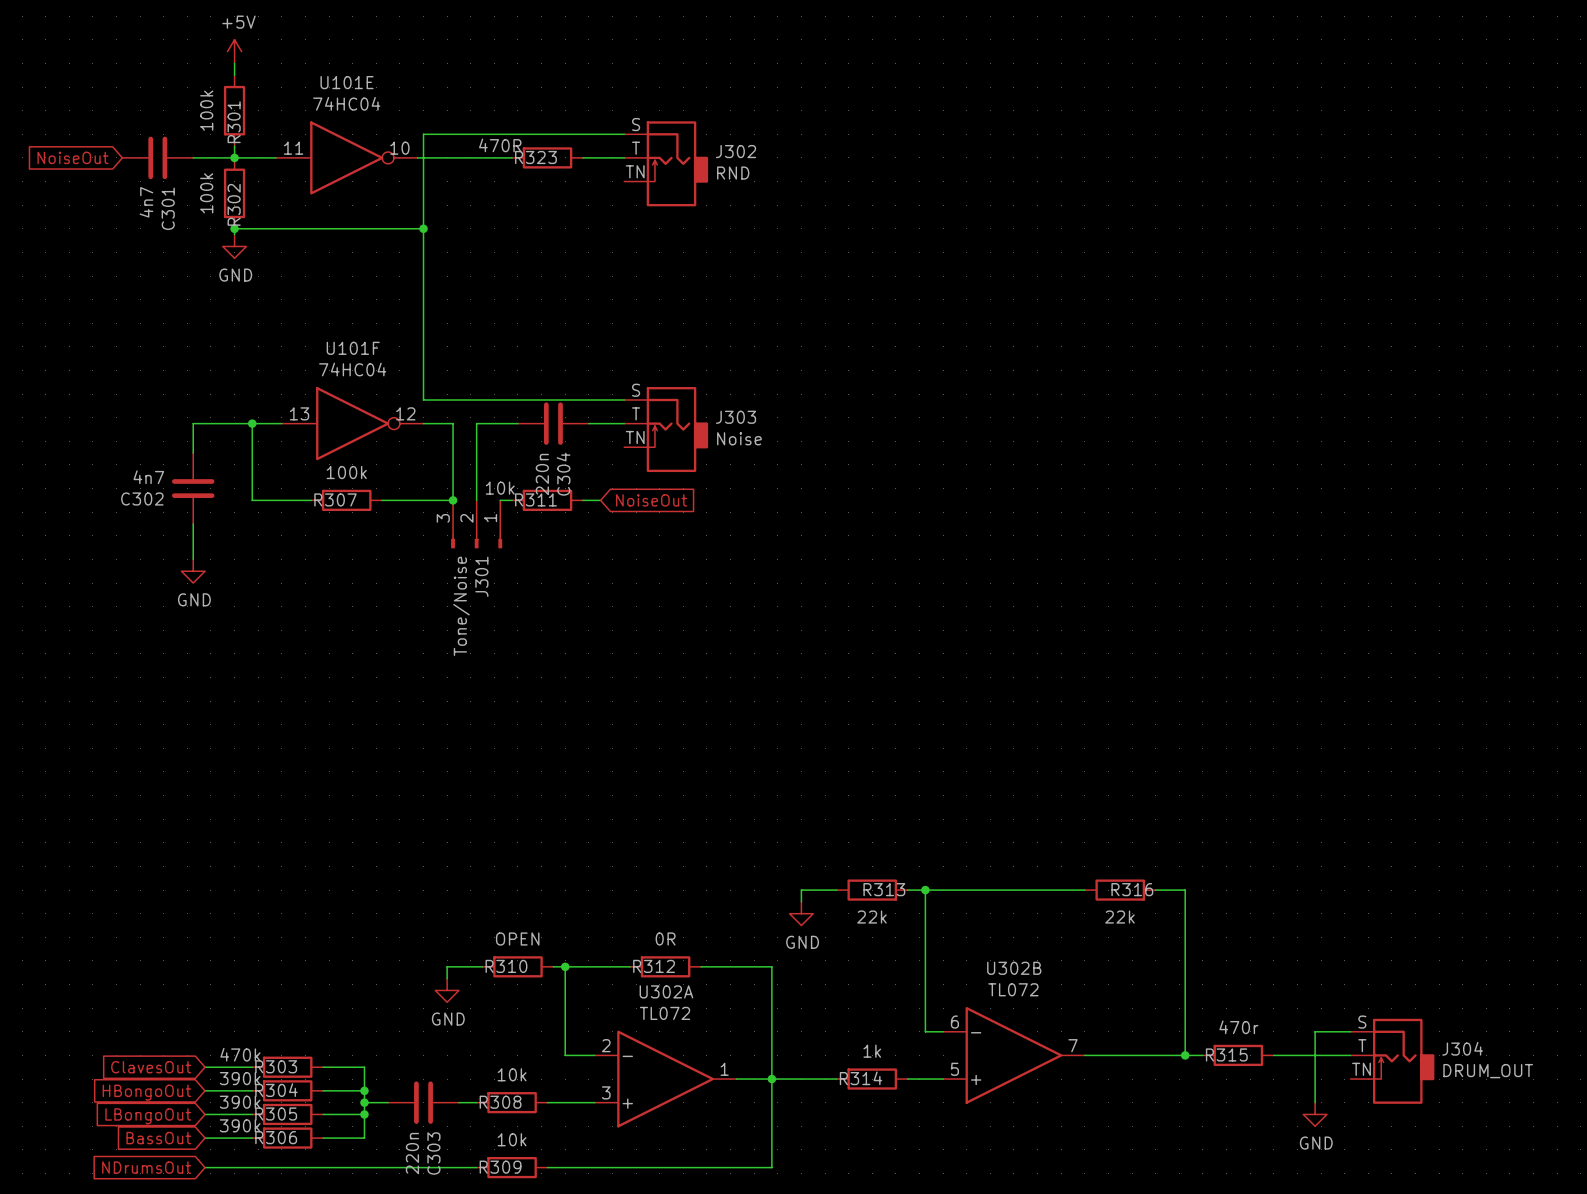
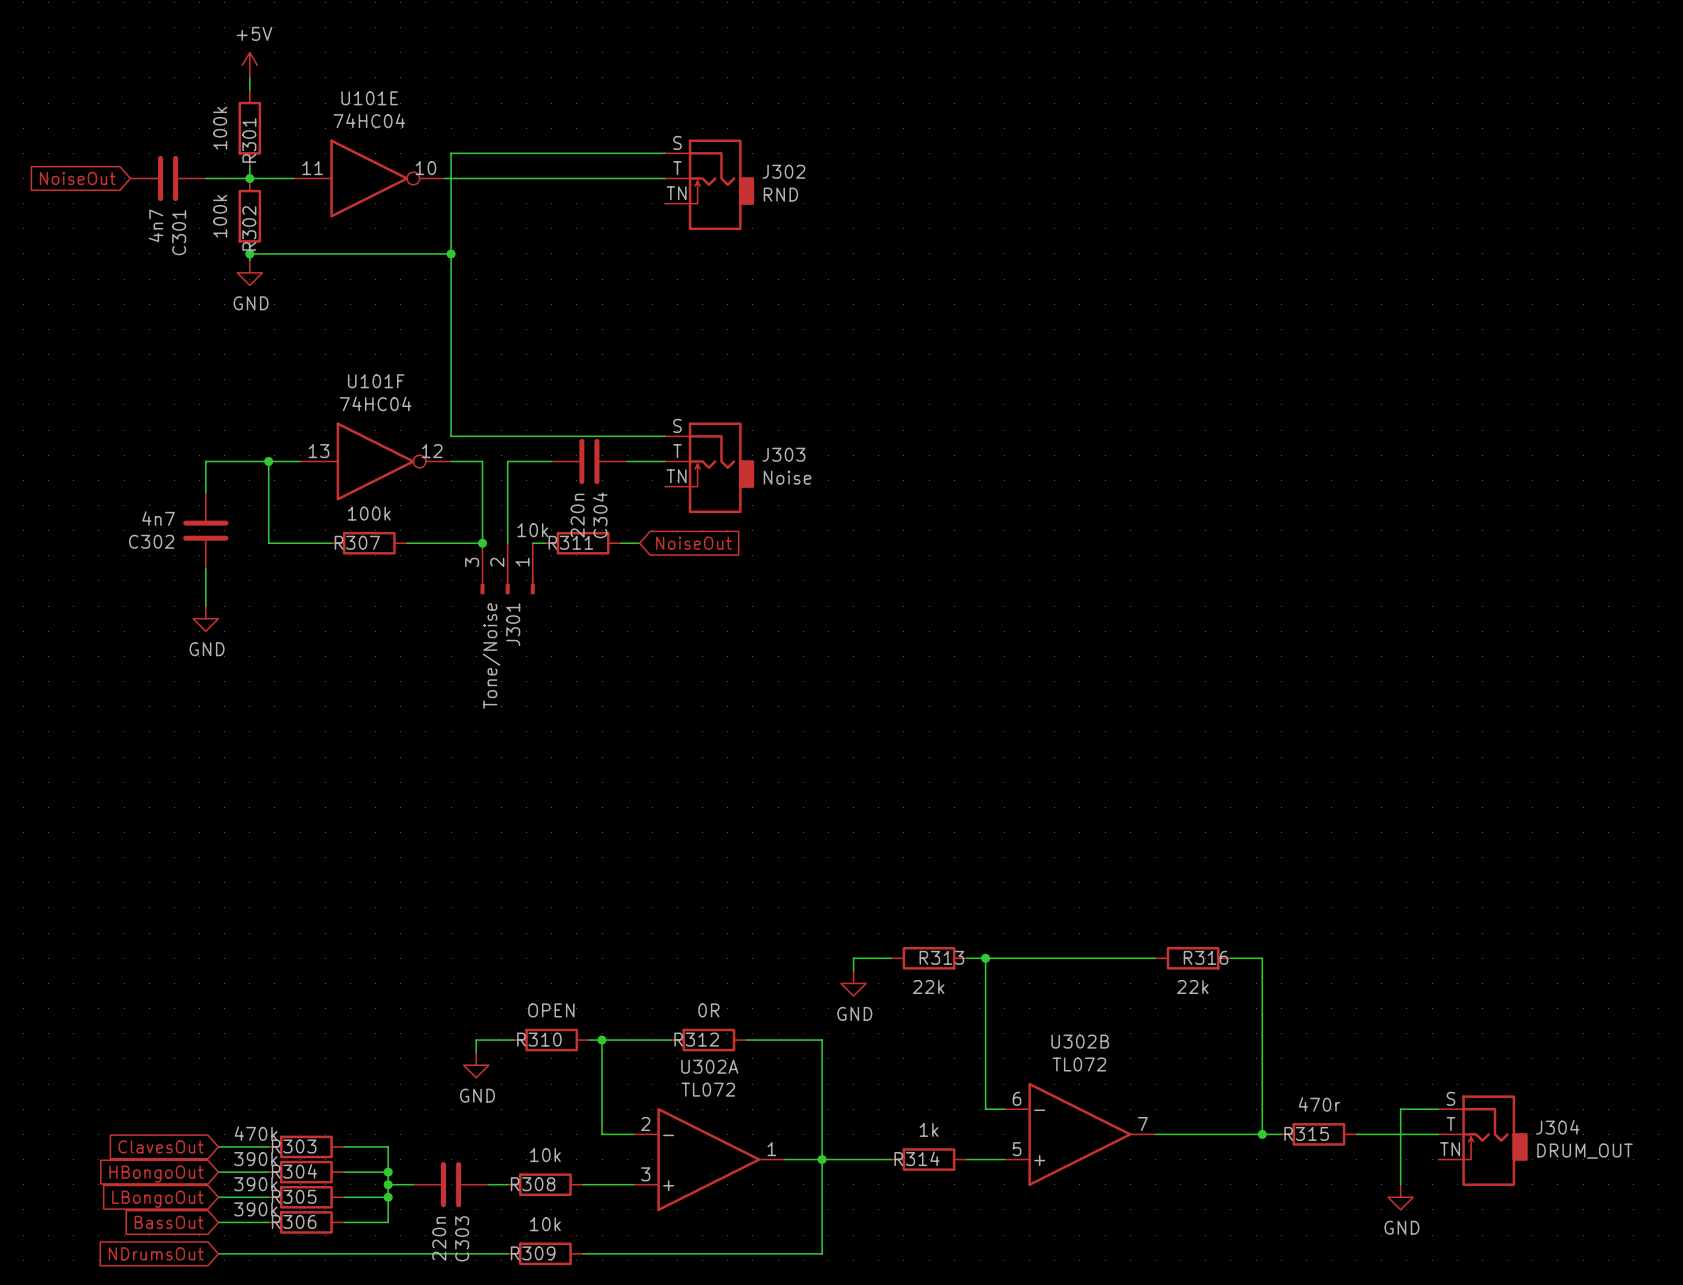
wire: none -> (545, 178) (620, 178)
R323: 470R (547, 157) -> none

